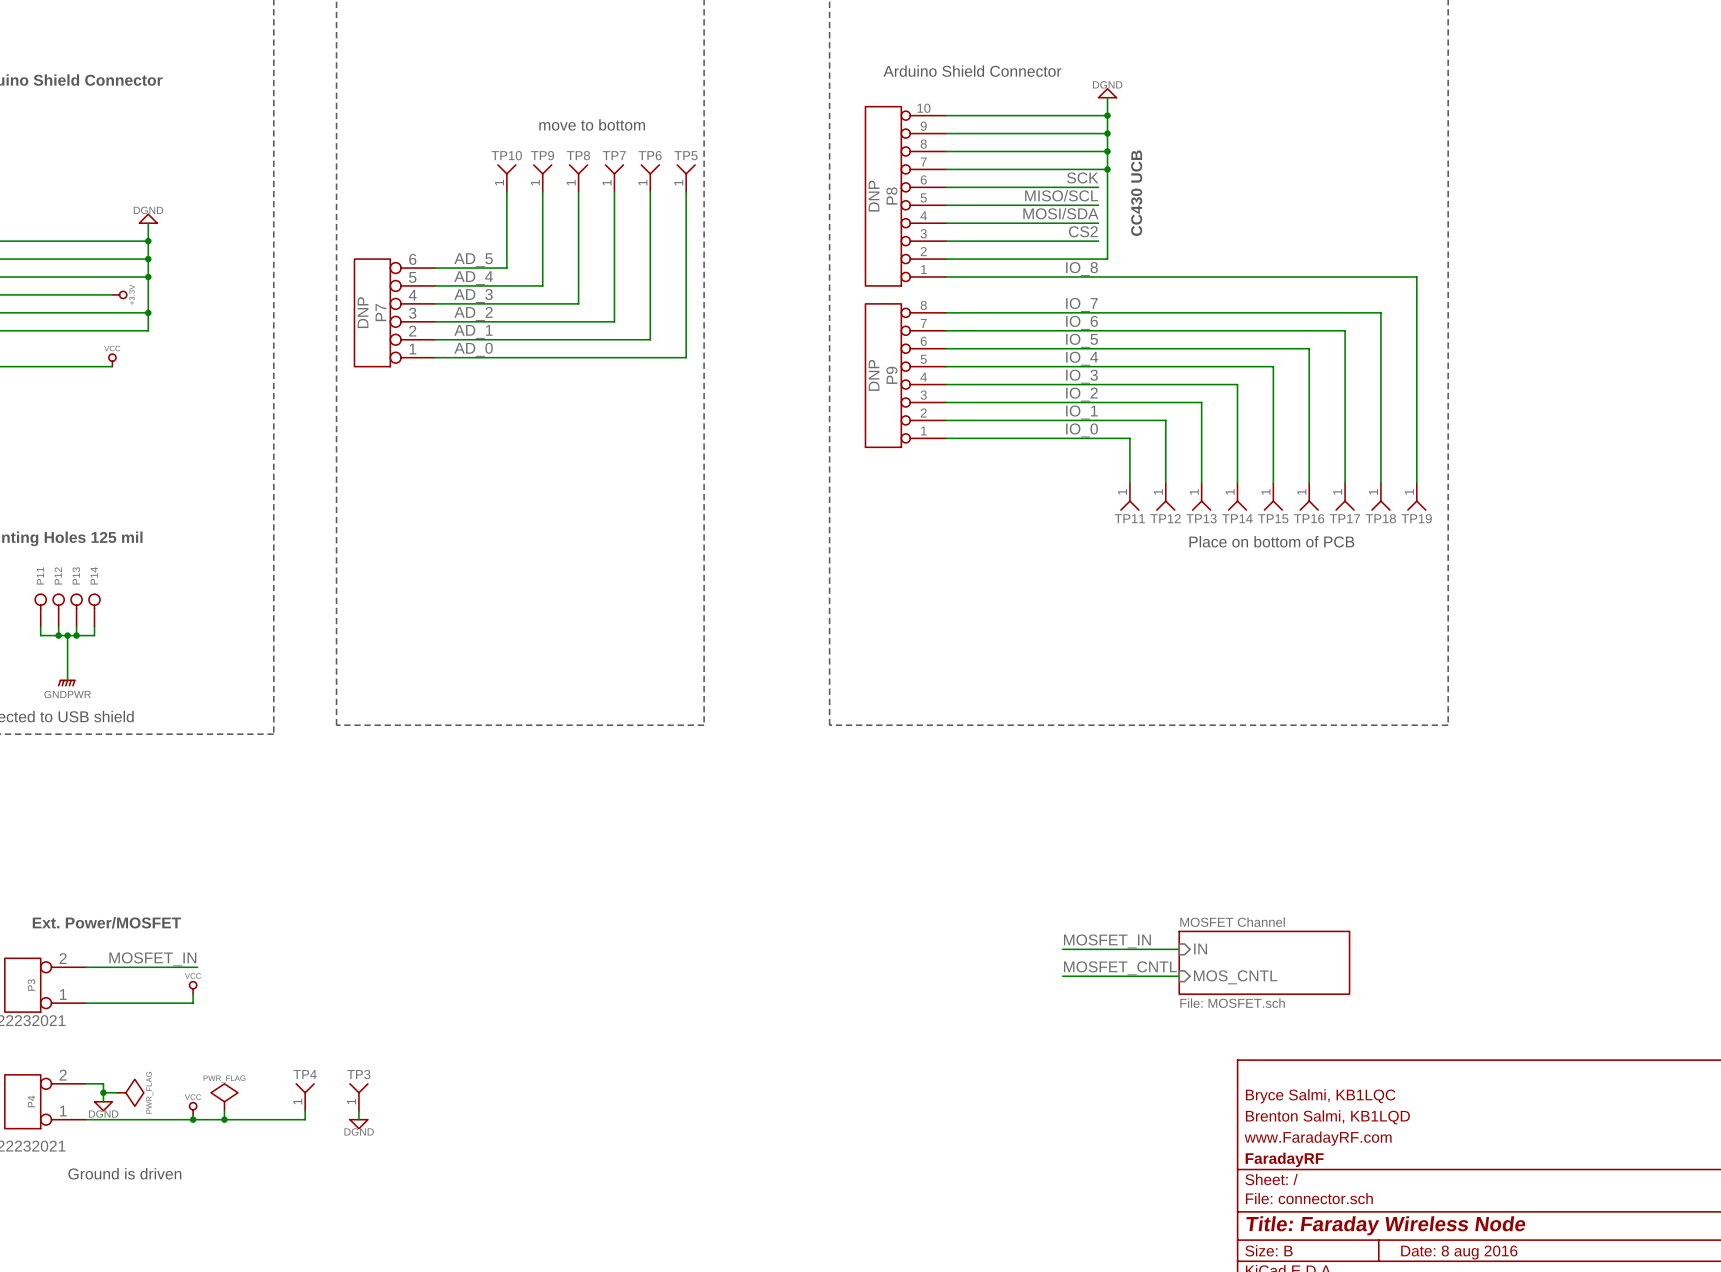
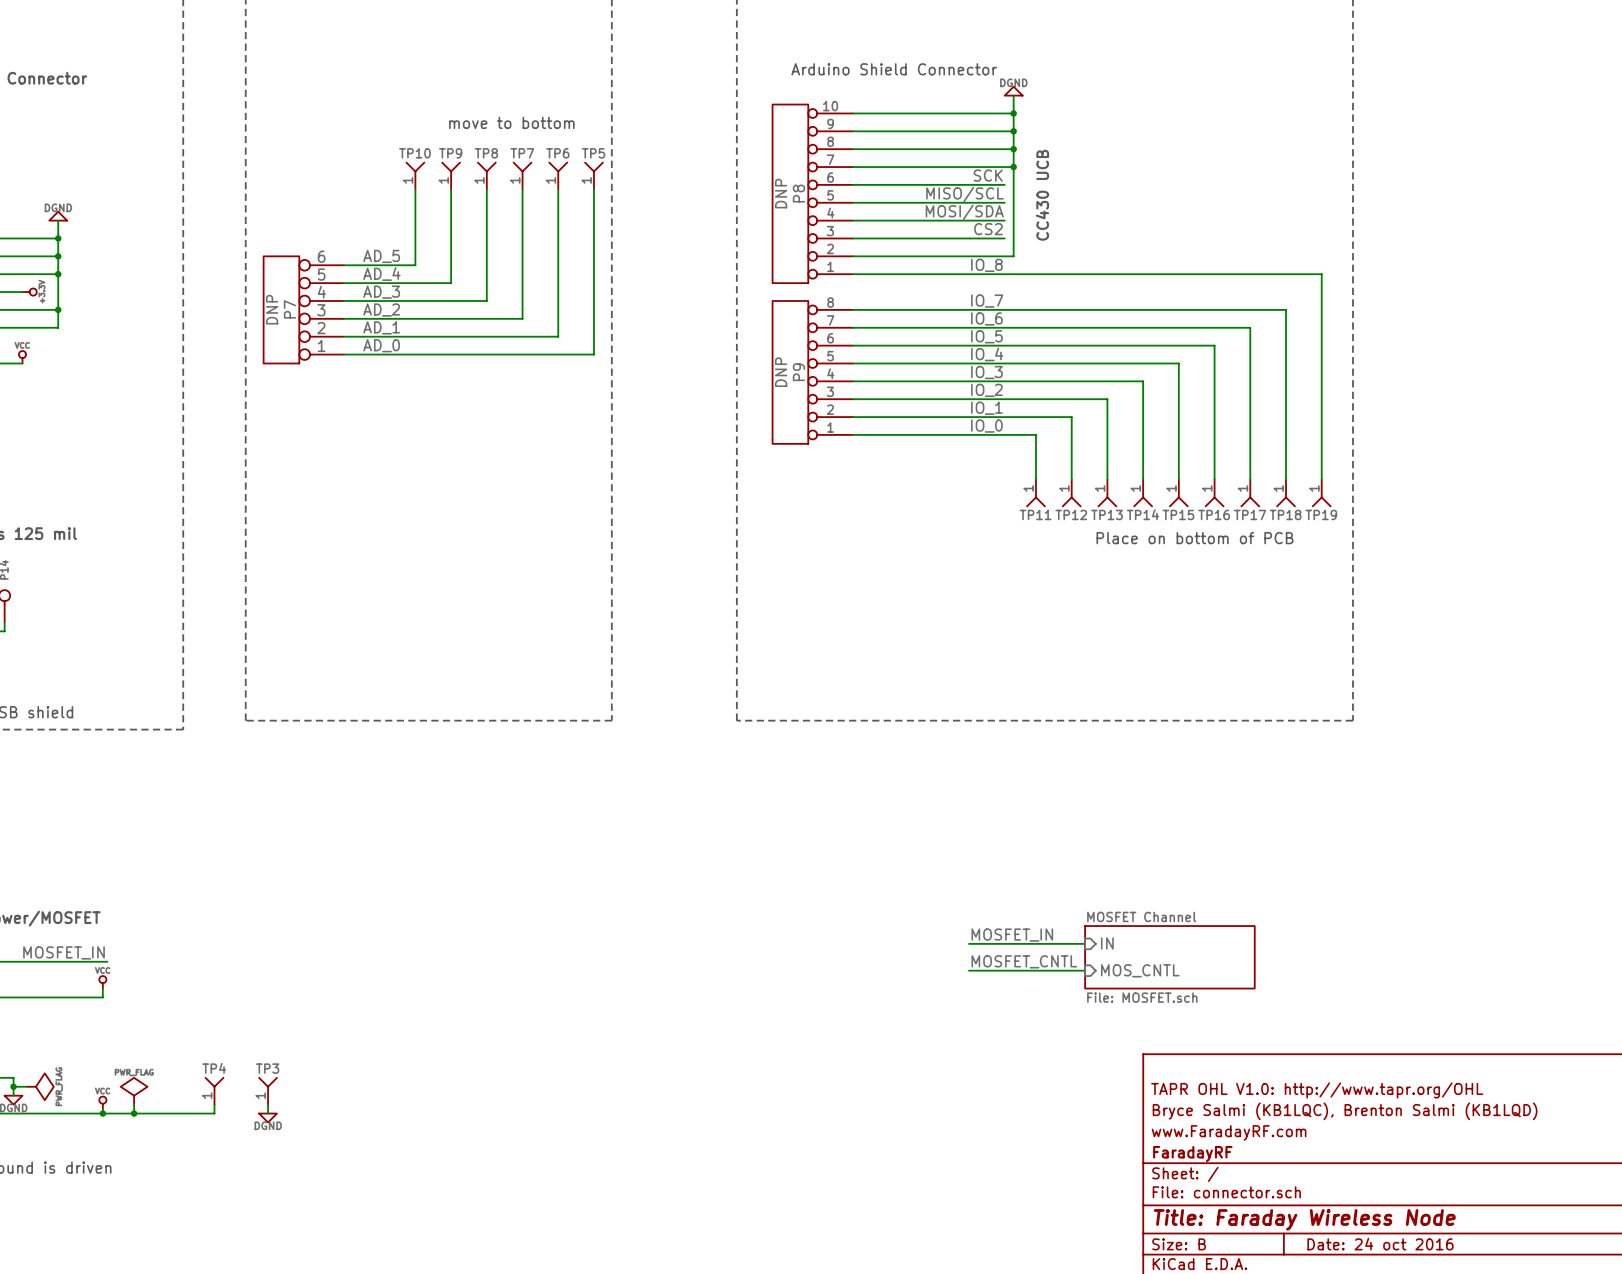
title block: Bryce Salmi, KB1LQC (1320, 1096) -> TAPR OHL V1.0: http://www.tapr.org/OHL (1317, 1090)
title block: Brenton Salmi, KB1LQD (1327, 1117) -> Bryce Salmi (KB1LQC), Brenton Salmi (KB1LQD) (1345, 1111)
title block: Date: 8 aug 2016 (1459, 1252) -> Date: 24 oct 2016 (1380, 1244)

